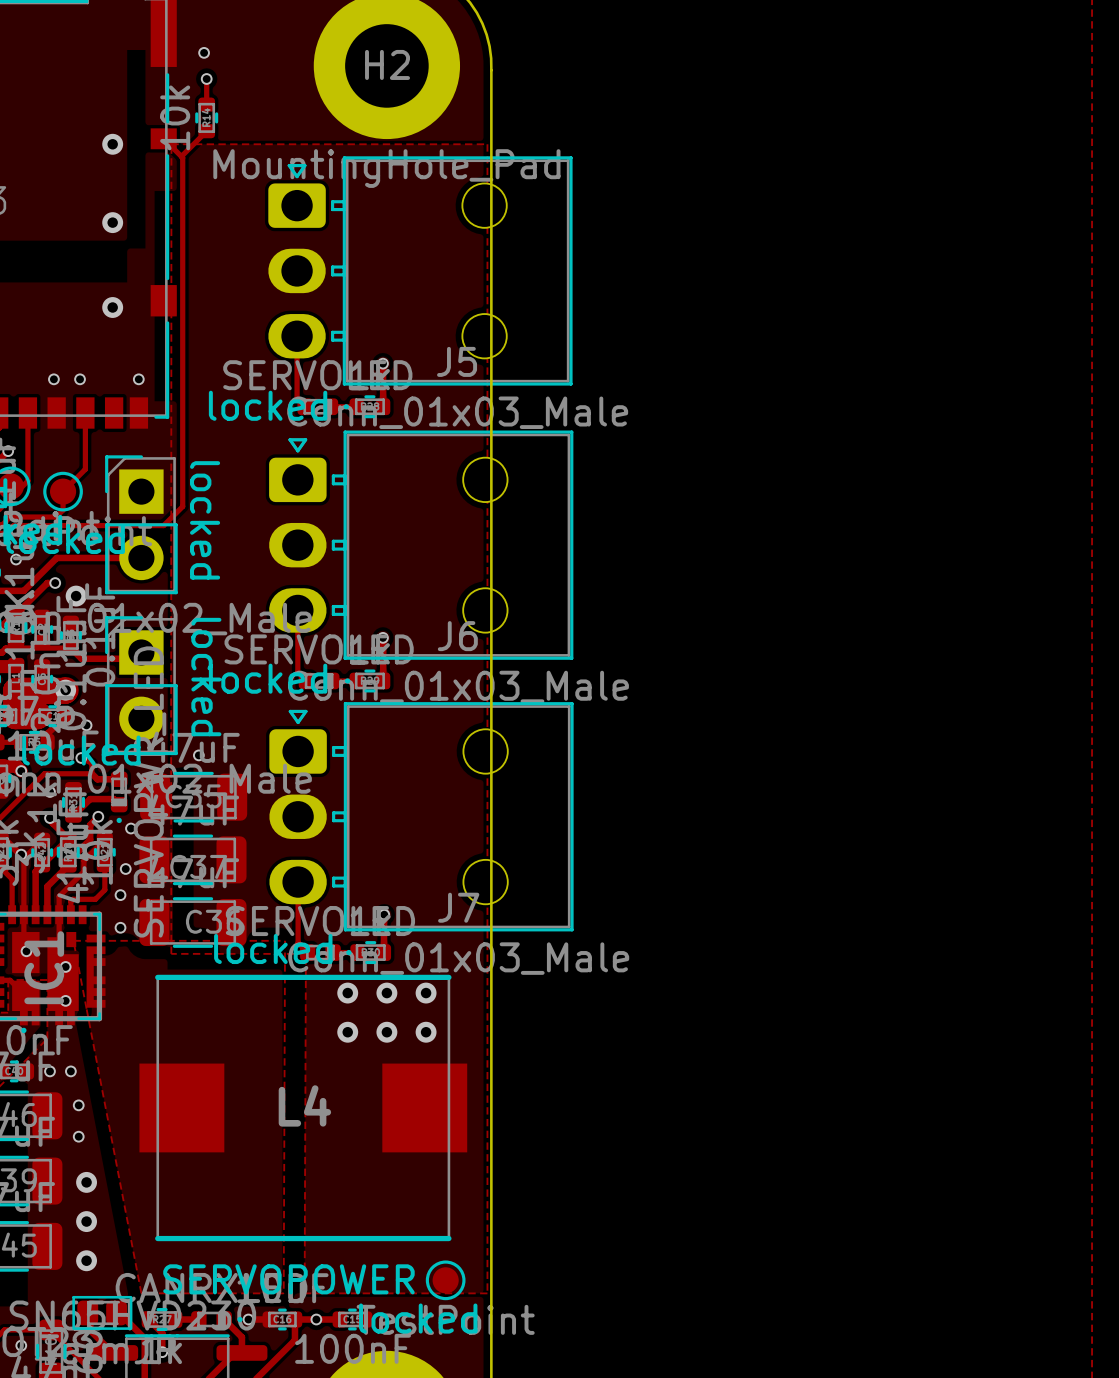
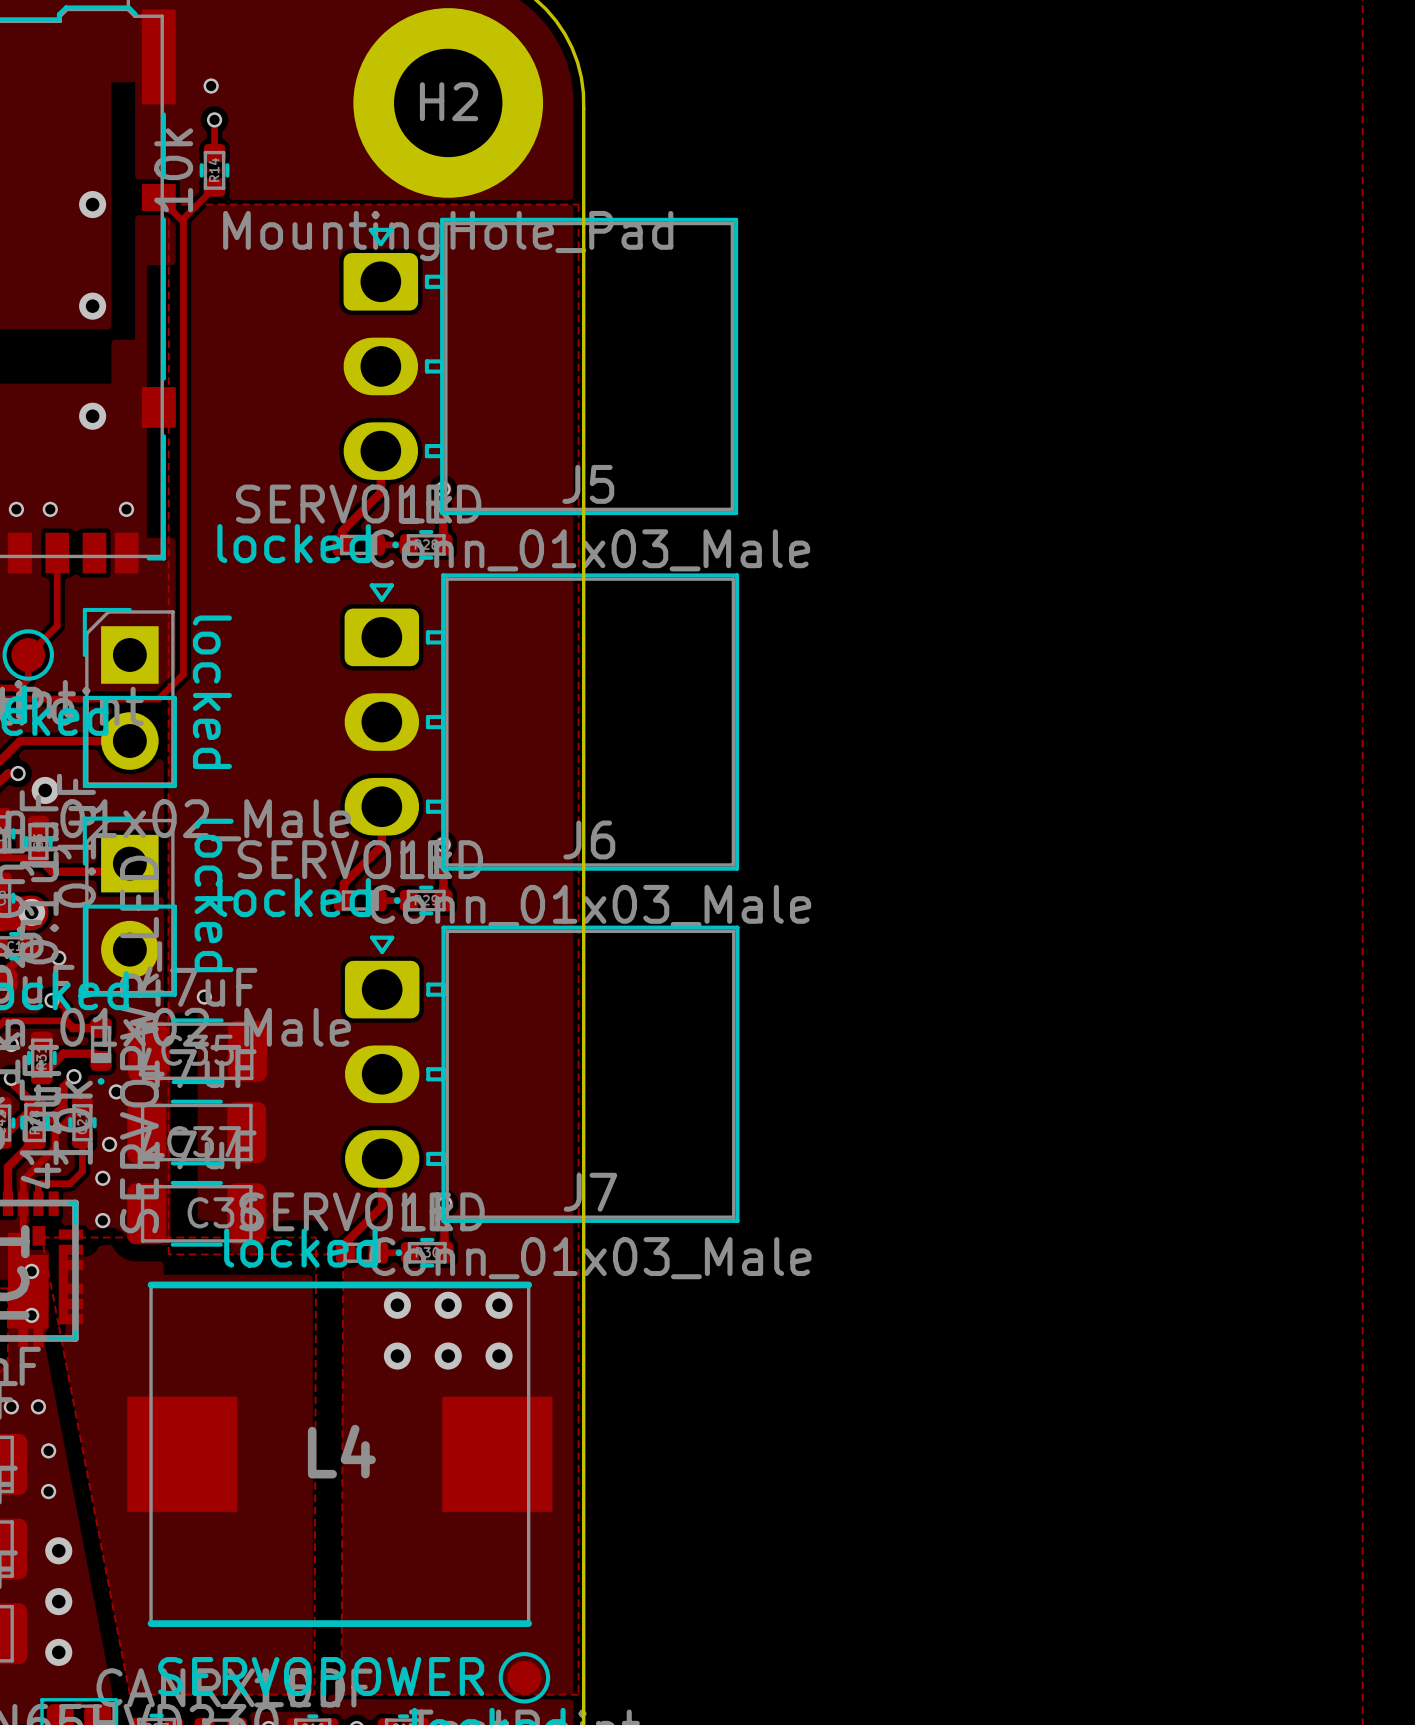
J5 footprint: [268, 156, 573, 386] -> [343, 217, 739, 516]
track: (297, 336) (297, 398) (305, 406) -> (380, 451) (380, 492) (342, 531) (342, 544)
J6 footprint: [269, 430, 574, 660] -> [344, 573, 740, 871]
track: (297, 610) (297, 672) (306, 680) -> (381, 806) (381, 845) (343, 883) (343, 900)
J7 footprint: [269, 702, 574, 932] -> [344, 925, 740, 1223]
track: (298, 882) (298, 942) (307, 952) -> (382, 1158) (382, 1206) (345, 1242) (345, 1252)

